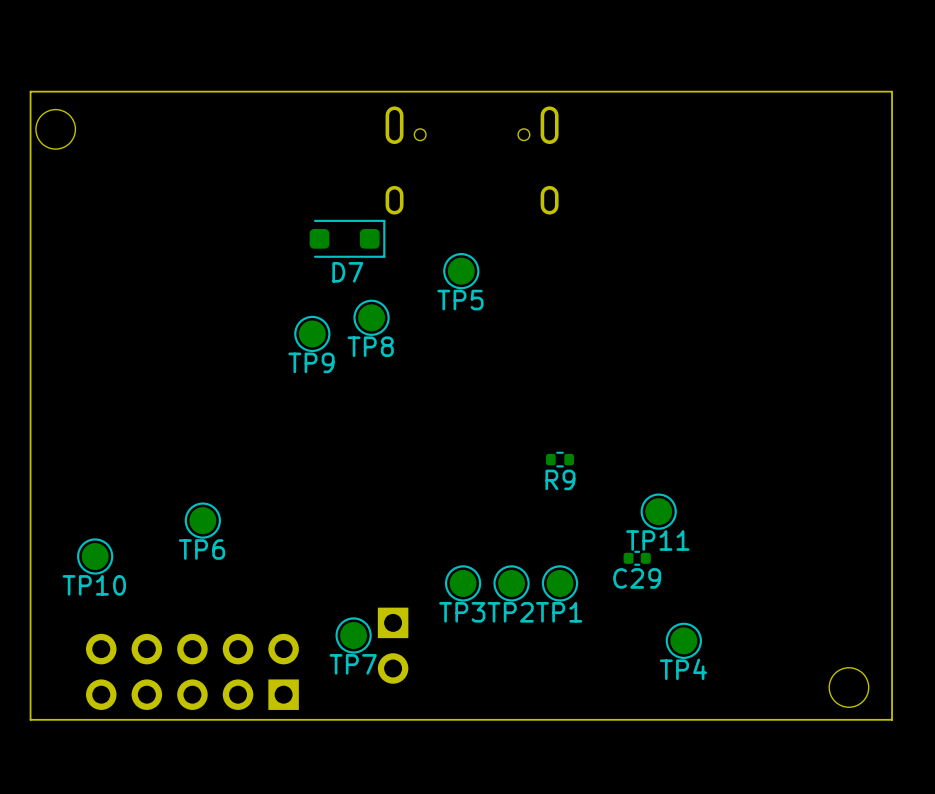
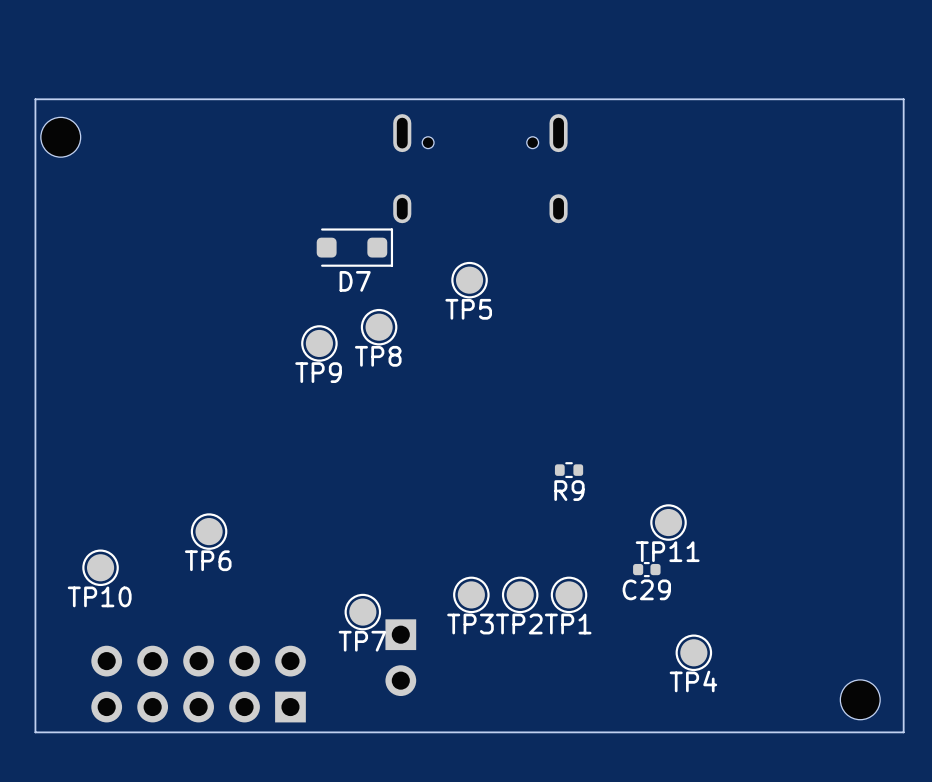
TP7 position: (353, 635) -> (362, 612)

